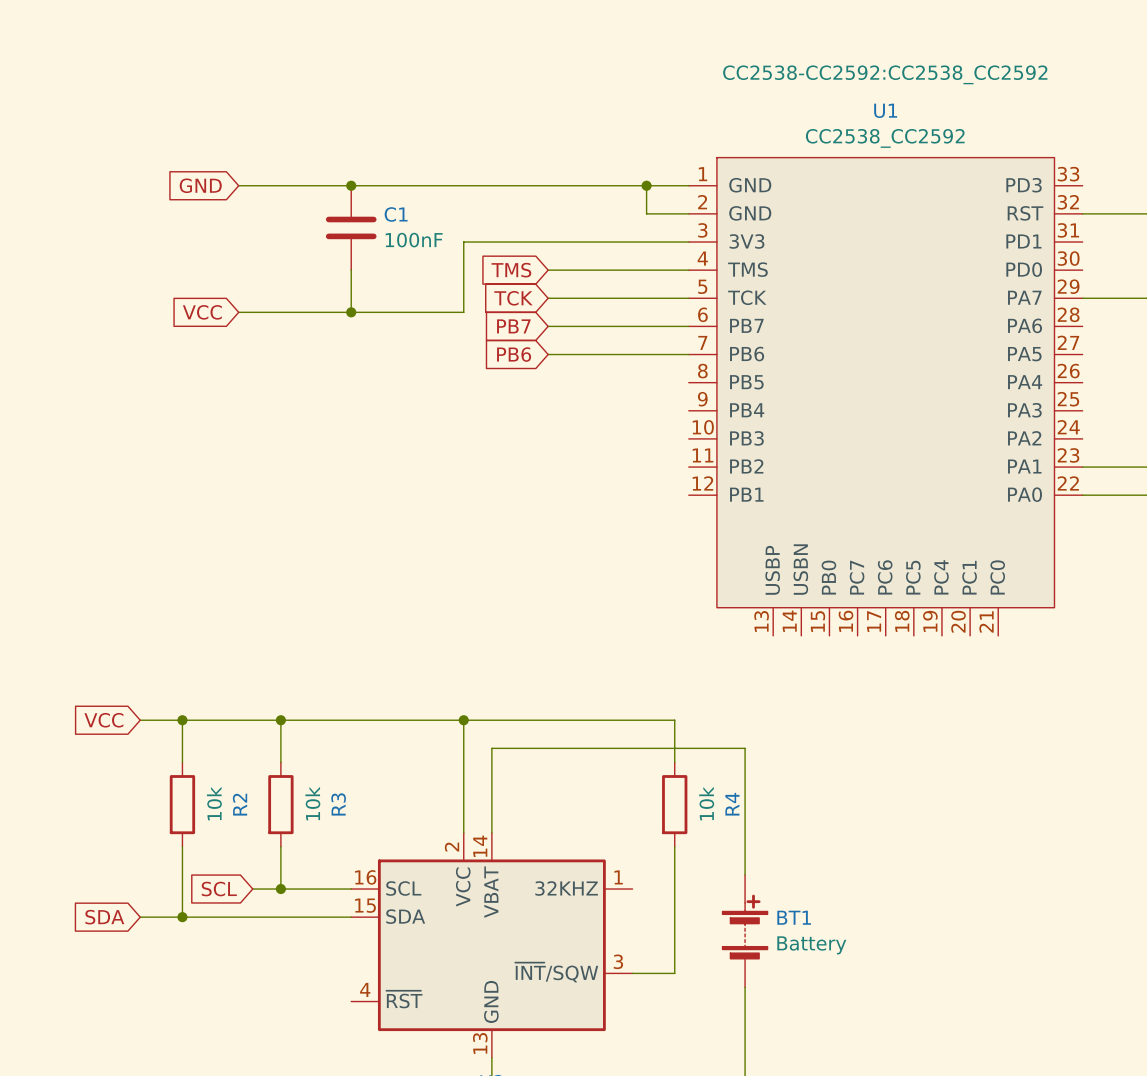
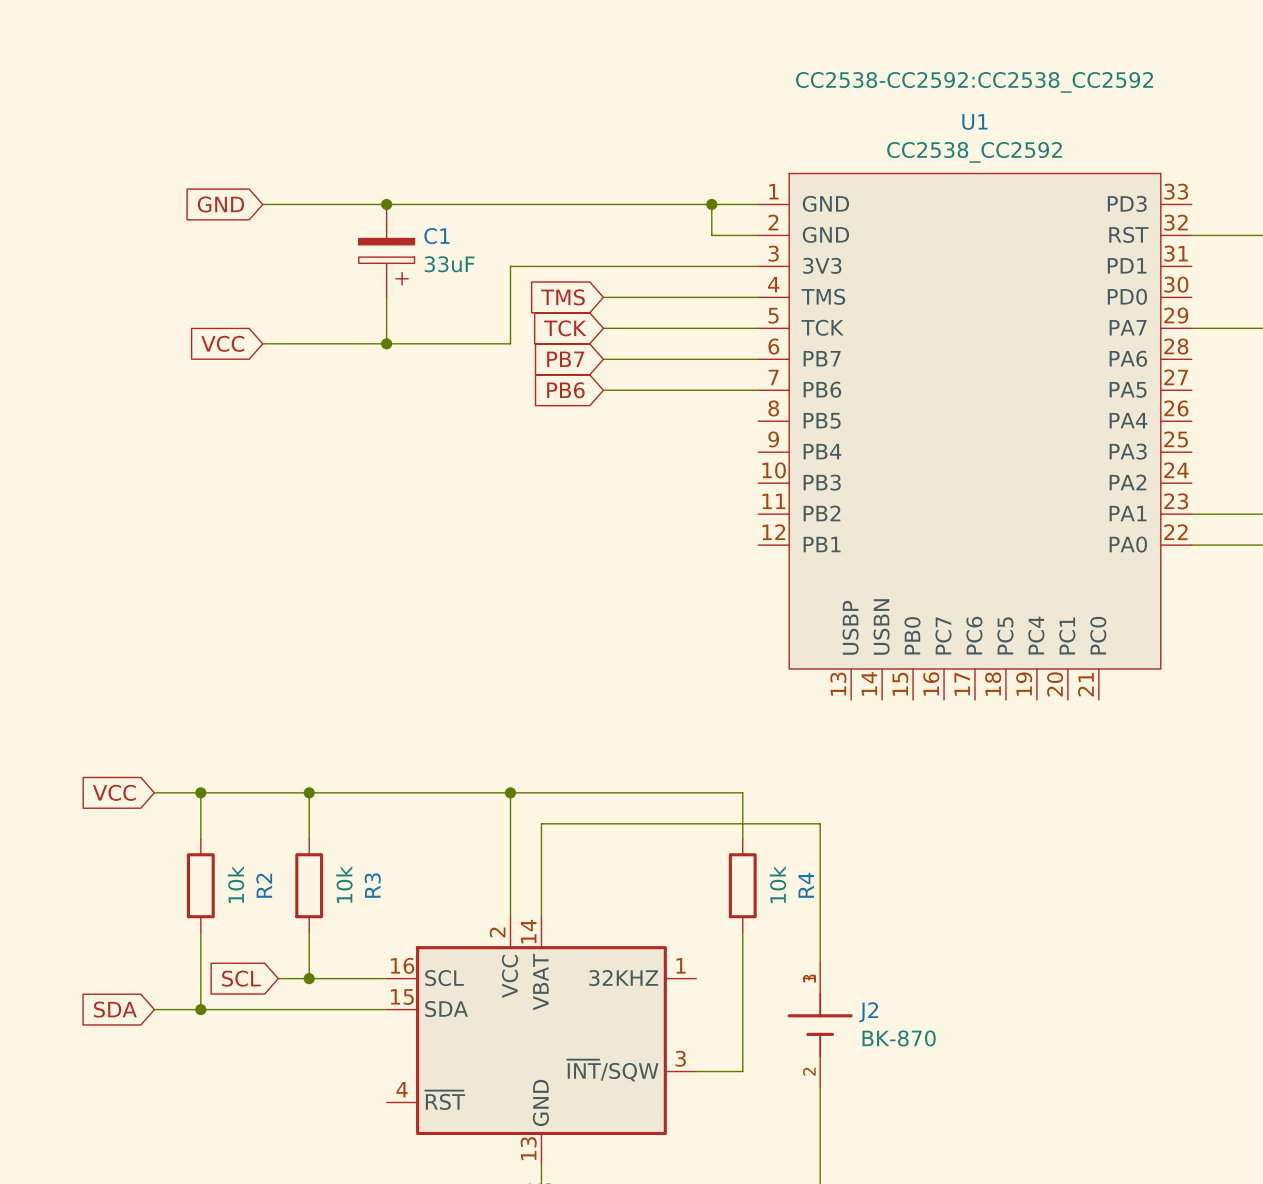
C1 symbol: [325, 185, 377, 271] -> [358, 204, 415, 298]
C1 value: 100nF (414, 240) -> 33uF (449, 264)
BT1: Battery (745, 931) -> none
J2: none -> BK-870 (820, 1025)

